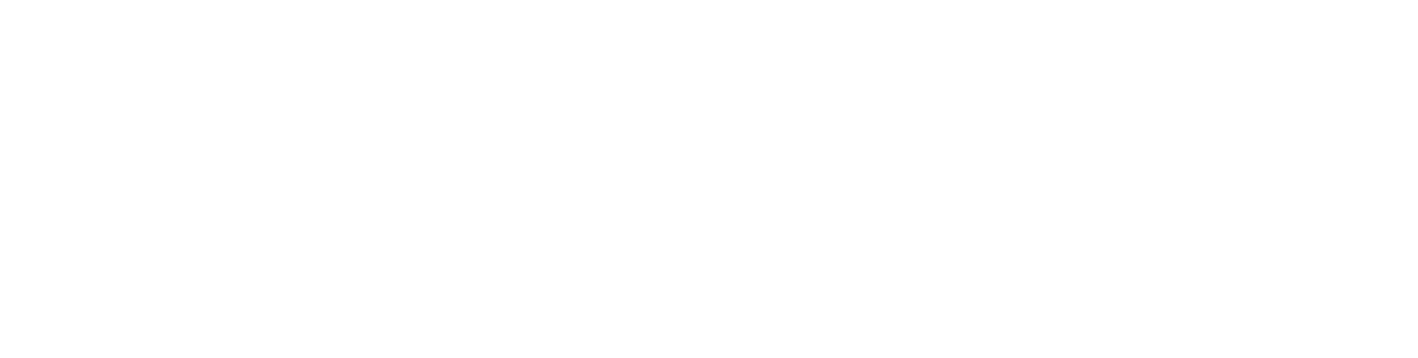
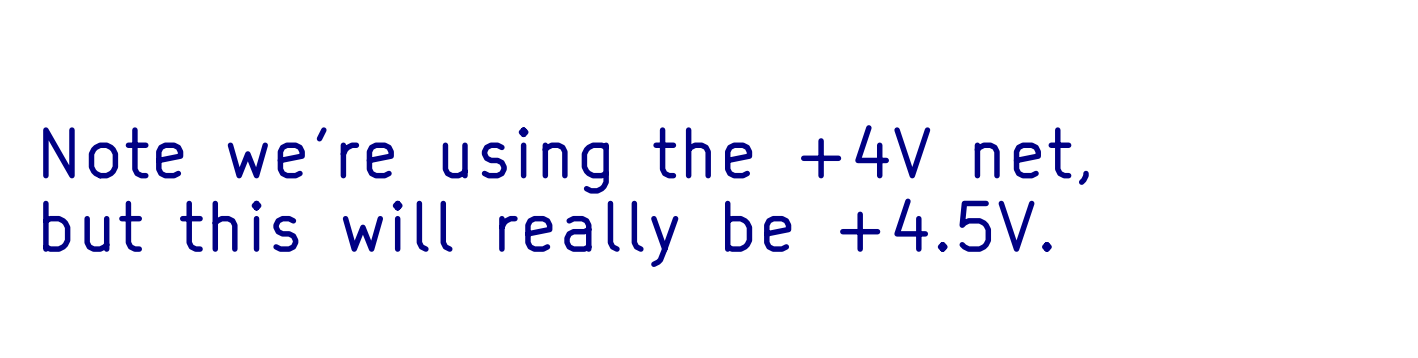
text: none -> Note we're using the +4V net, (565, 159)
text: none -> but this will really be +4.5V. (547, 232)

